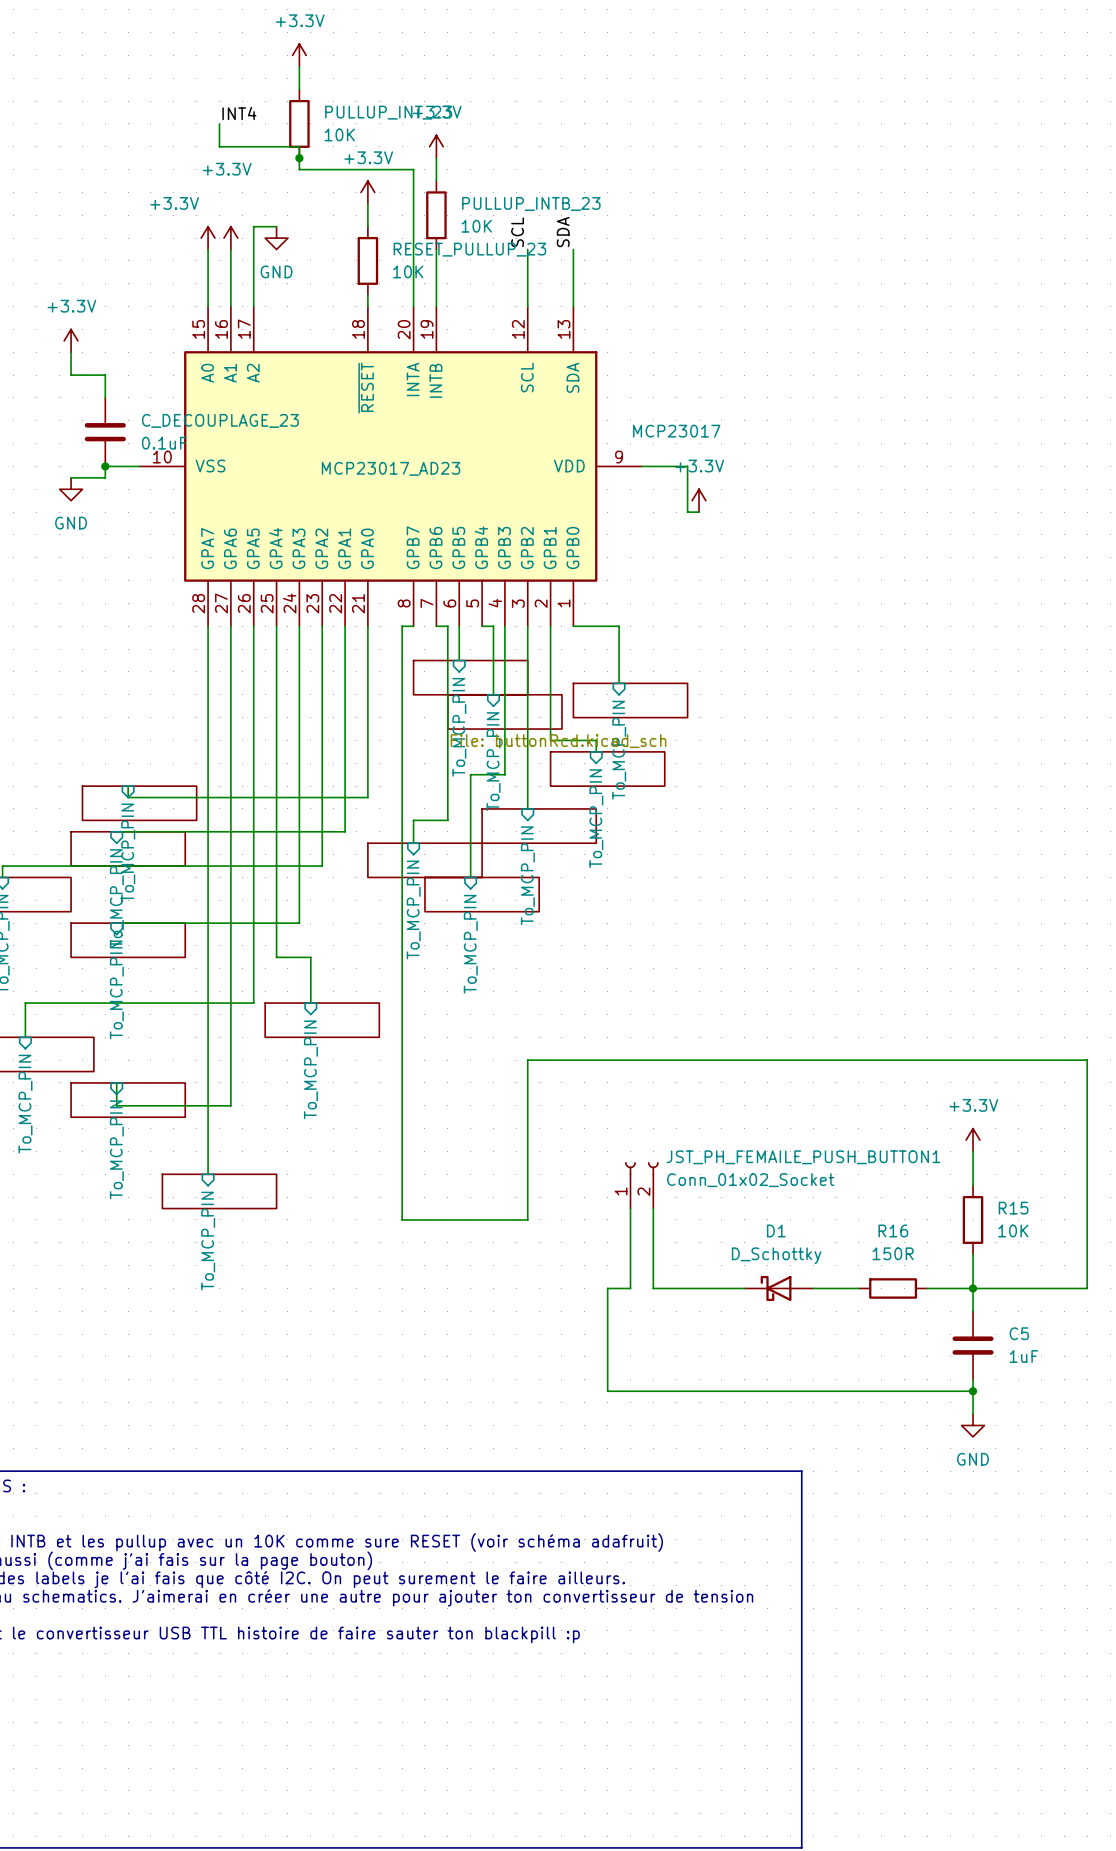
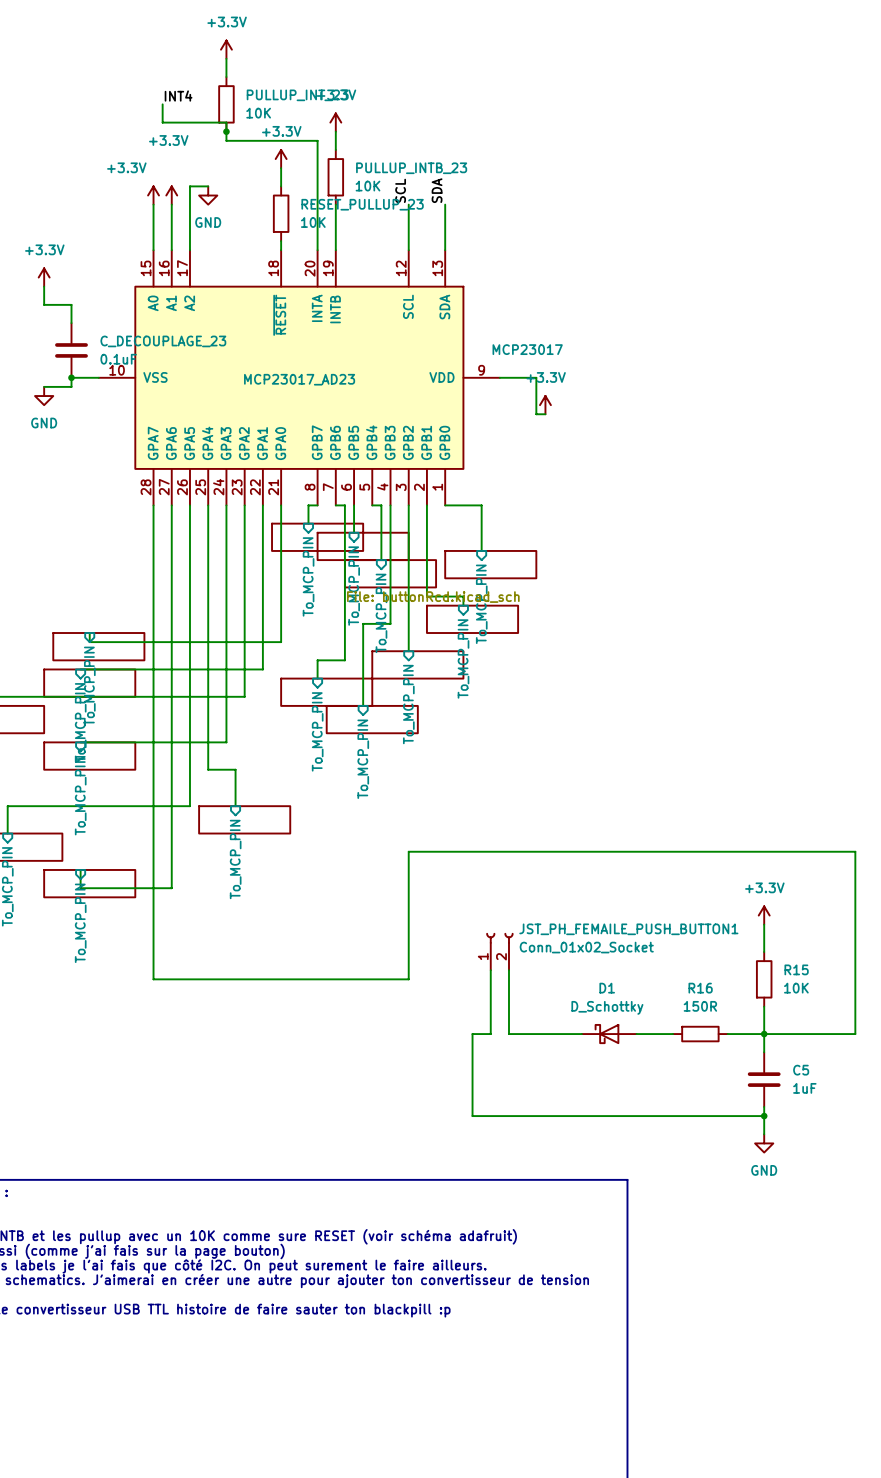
wire: (402, 649) (402, 1219) -> (153, 942) (153, 979) (308, 979)
sheet: none -> (317, 537)
sheet pin: none -> To_MCP_PIN (308, 576)
sheet: (219, 1191) -> none
sheet pin: To_MCP_PIN (208, 1241) -> none

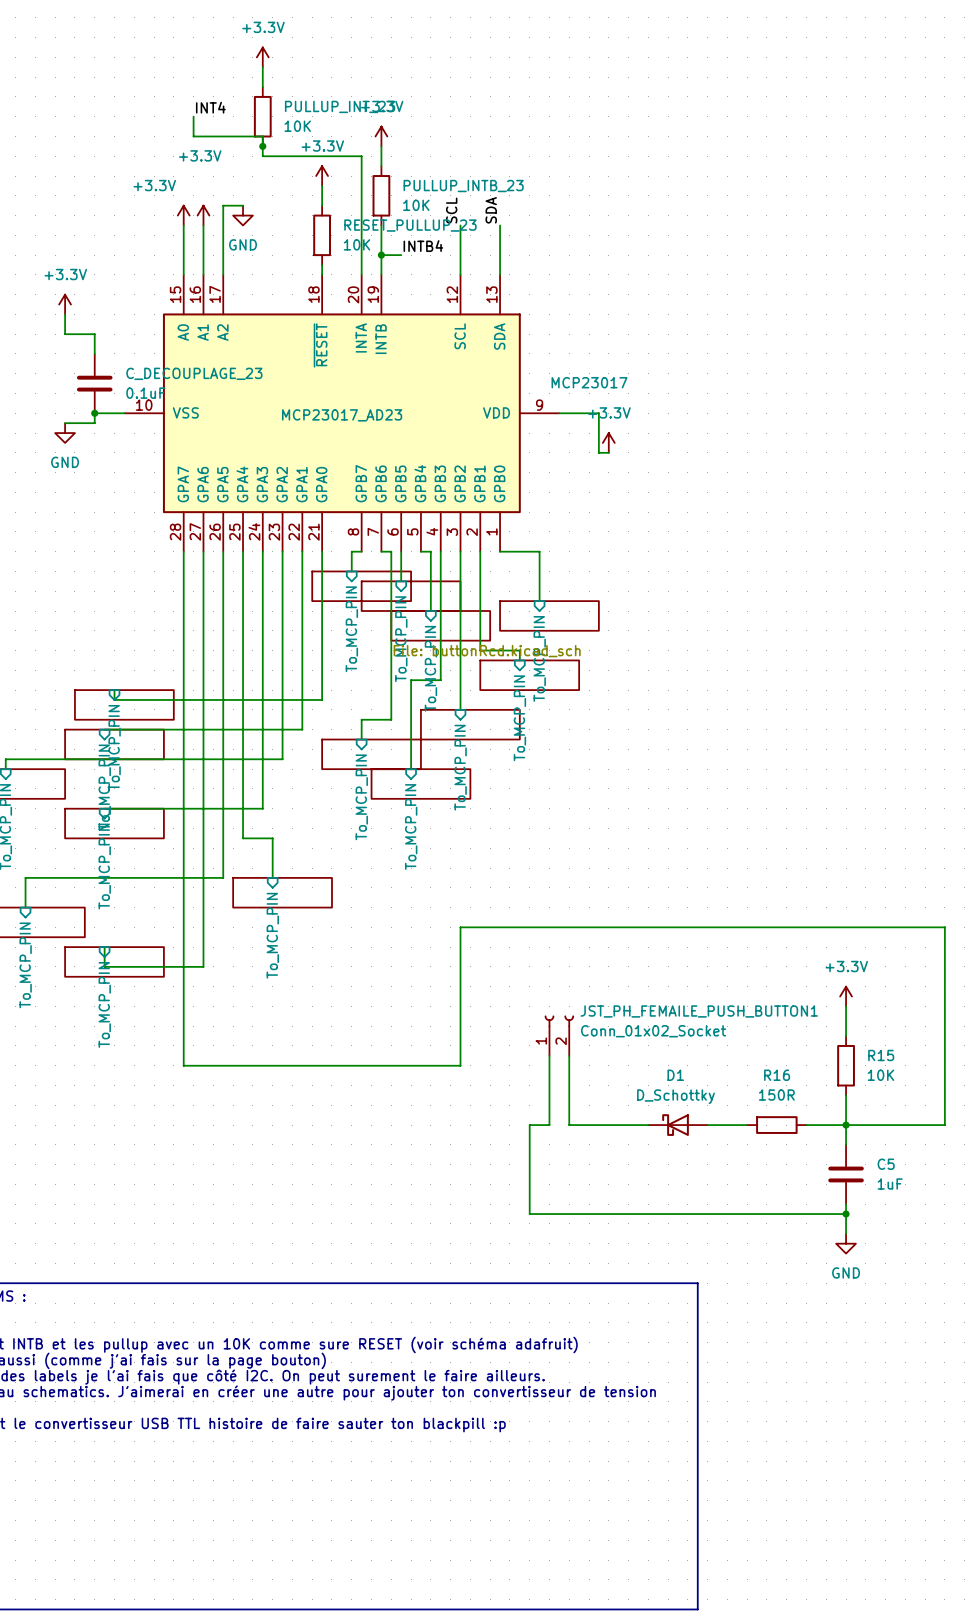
label: none -> INTB4 (423, 246)
wire: none -> (381, 255) (401, 255)
junction: none -> (381, 255)

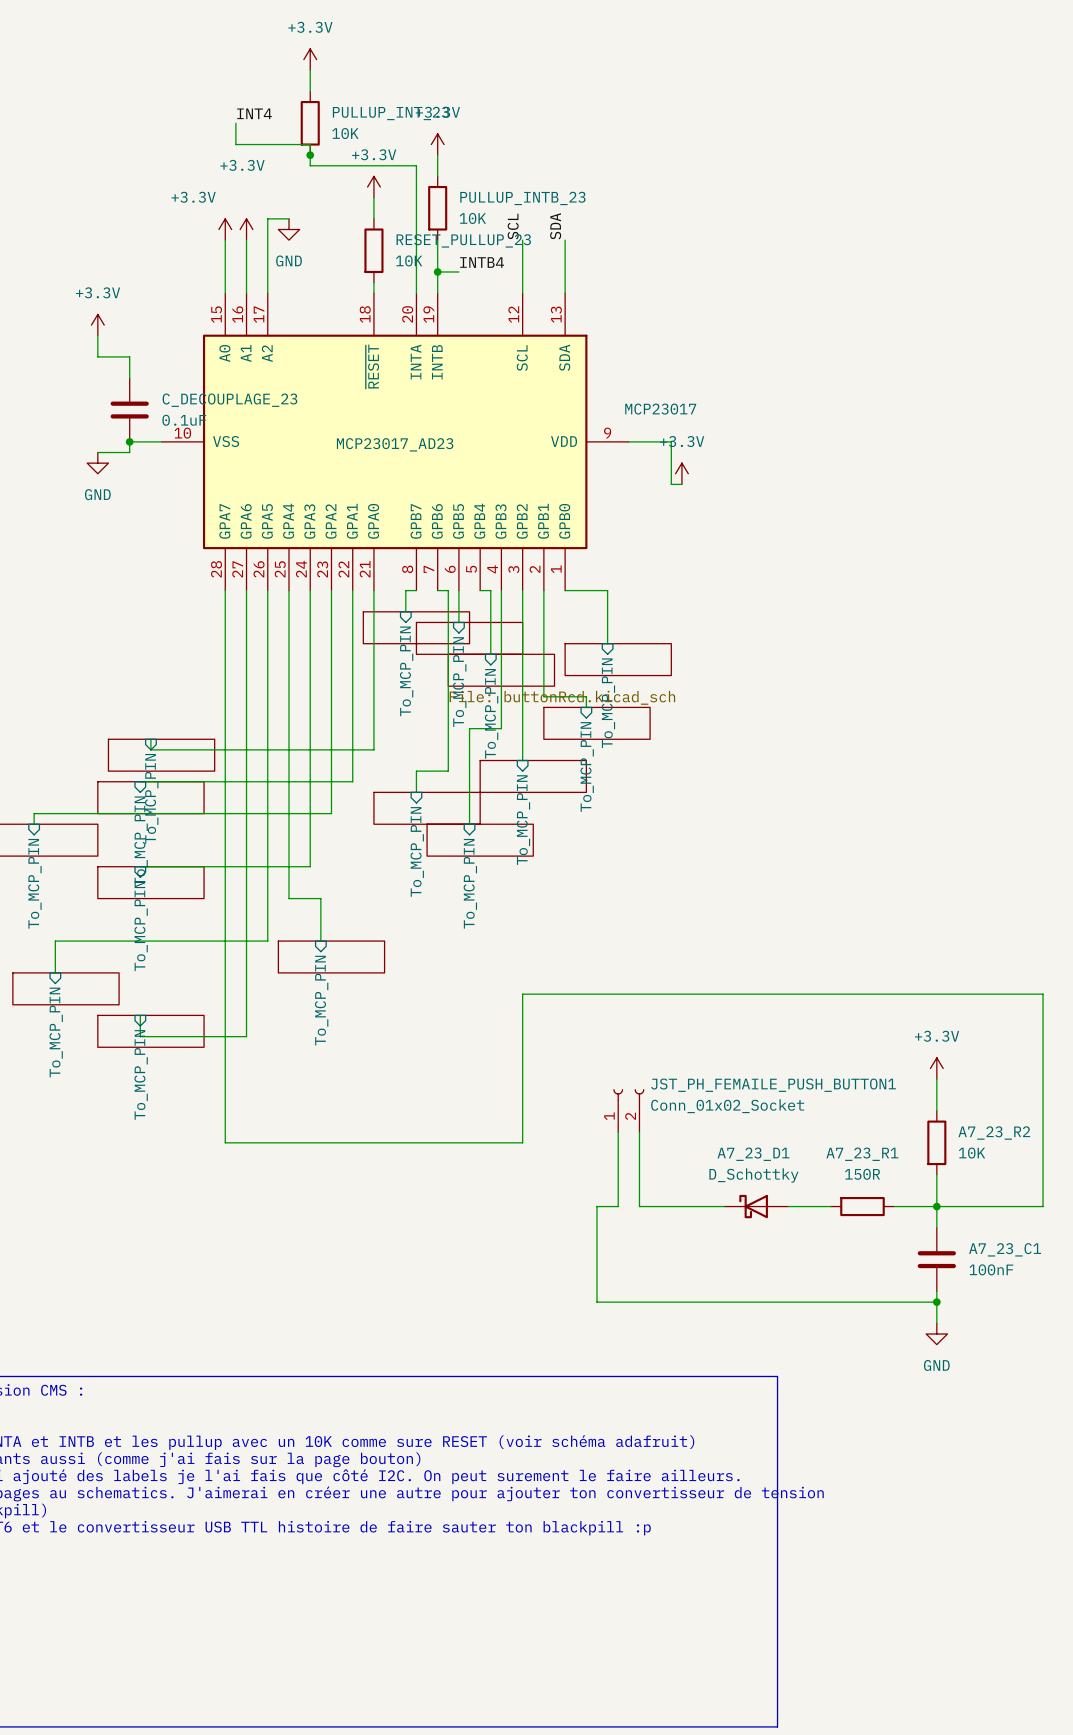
R15 name: R15 (881, 1055) -> A7_23_R2 (994, 1133)
D1 name: D1 (675, 1075) -> A7_23_D1 (753, 1154)
R16 name: R16 (777, 1075) -> A7_23_R1 (862, 1154)
C5 name: C5 (886, 1164) -> A7_23_C1 (1005, 1249)
C5 value: 1uF (890, 1184) -> 100nF (991, 1269)

